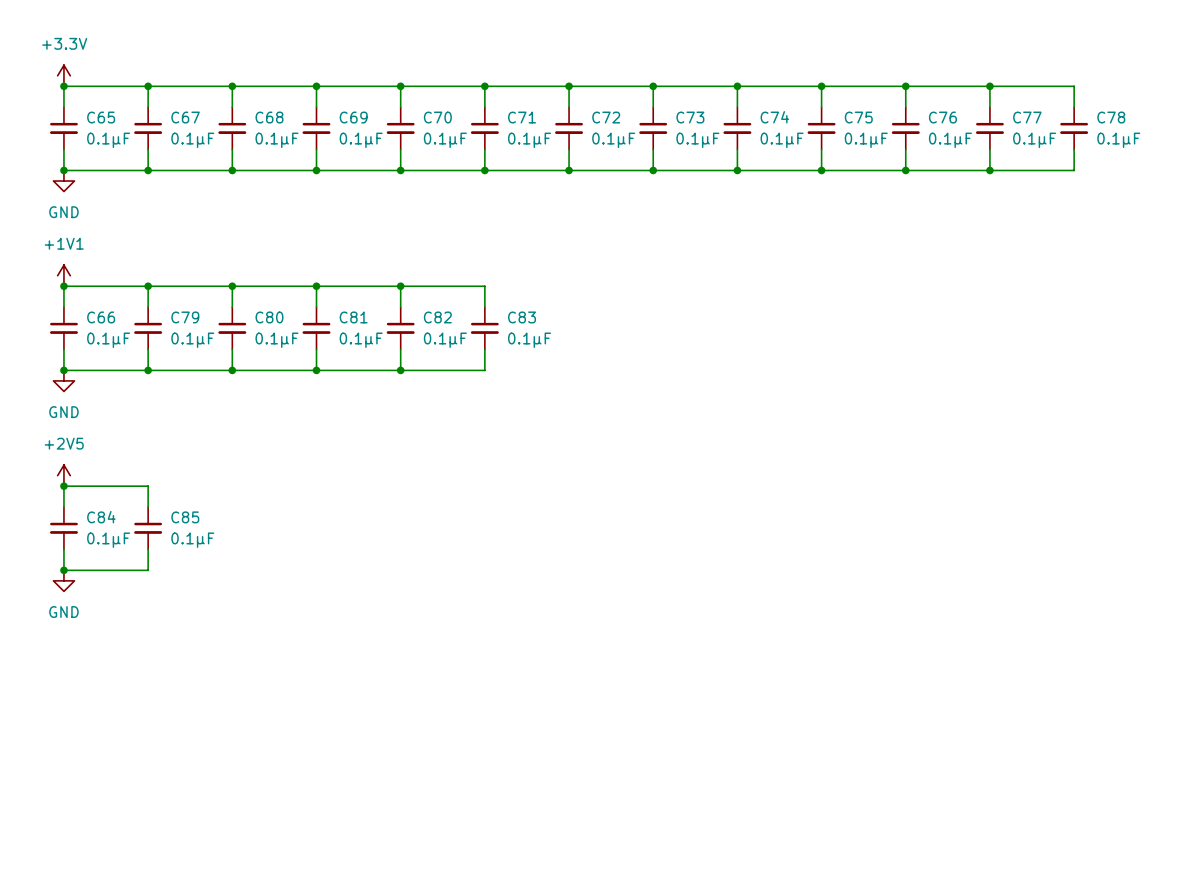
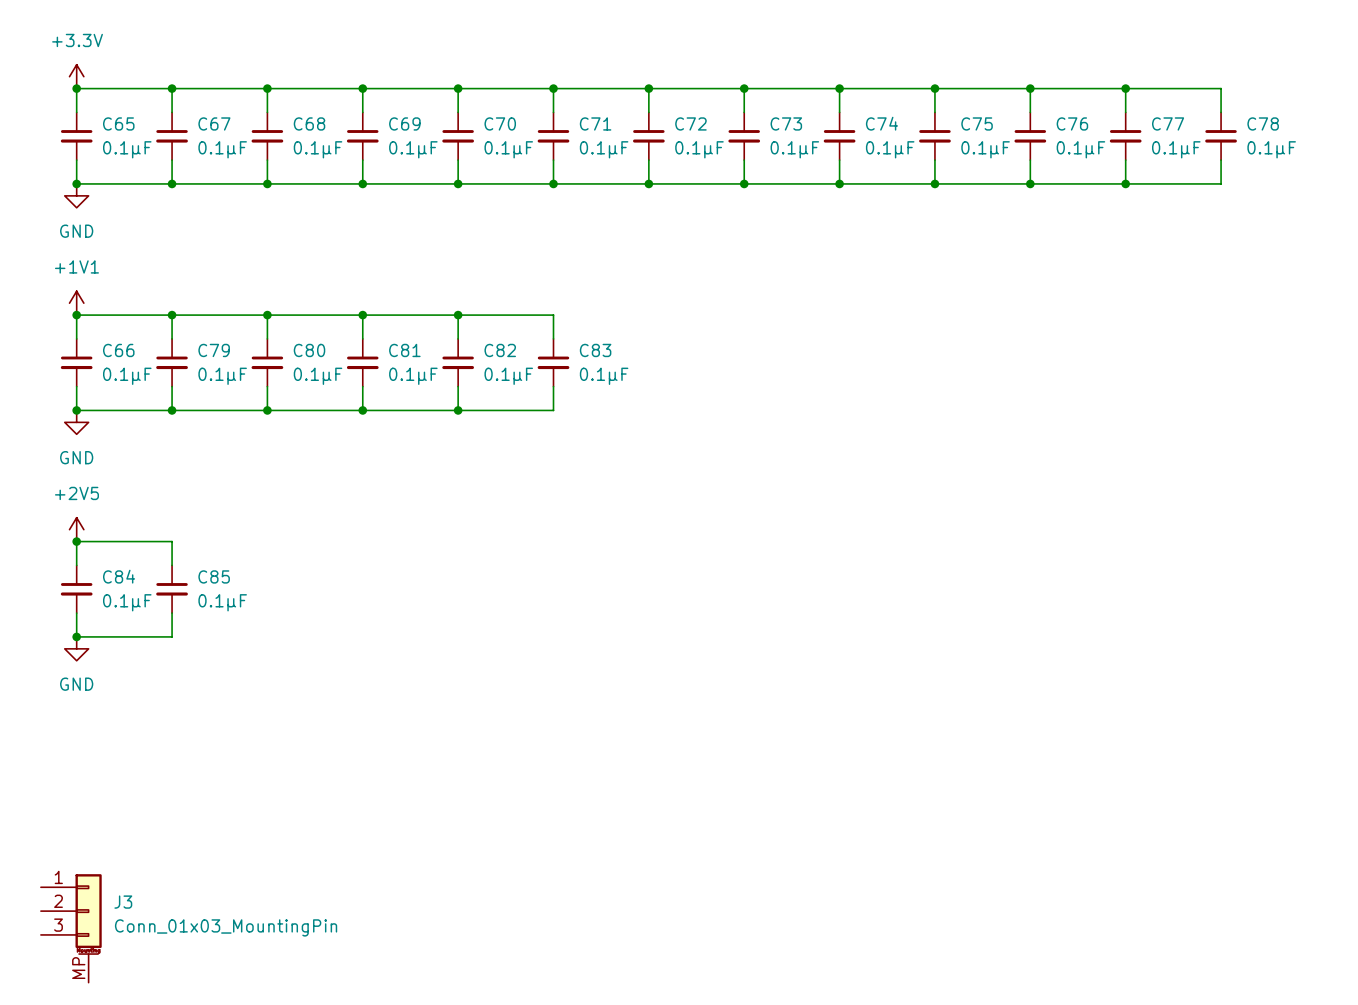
J3: none -> Conn_01x03_MountingPin (71, 928)

